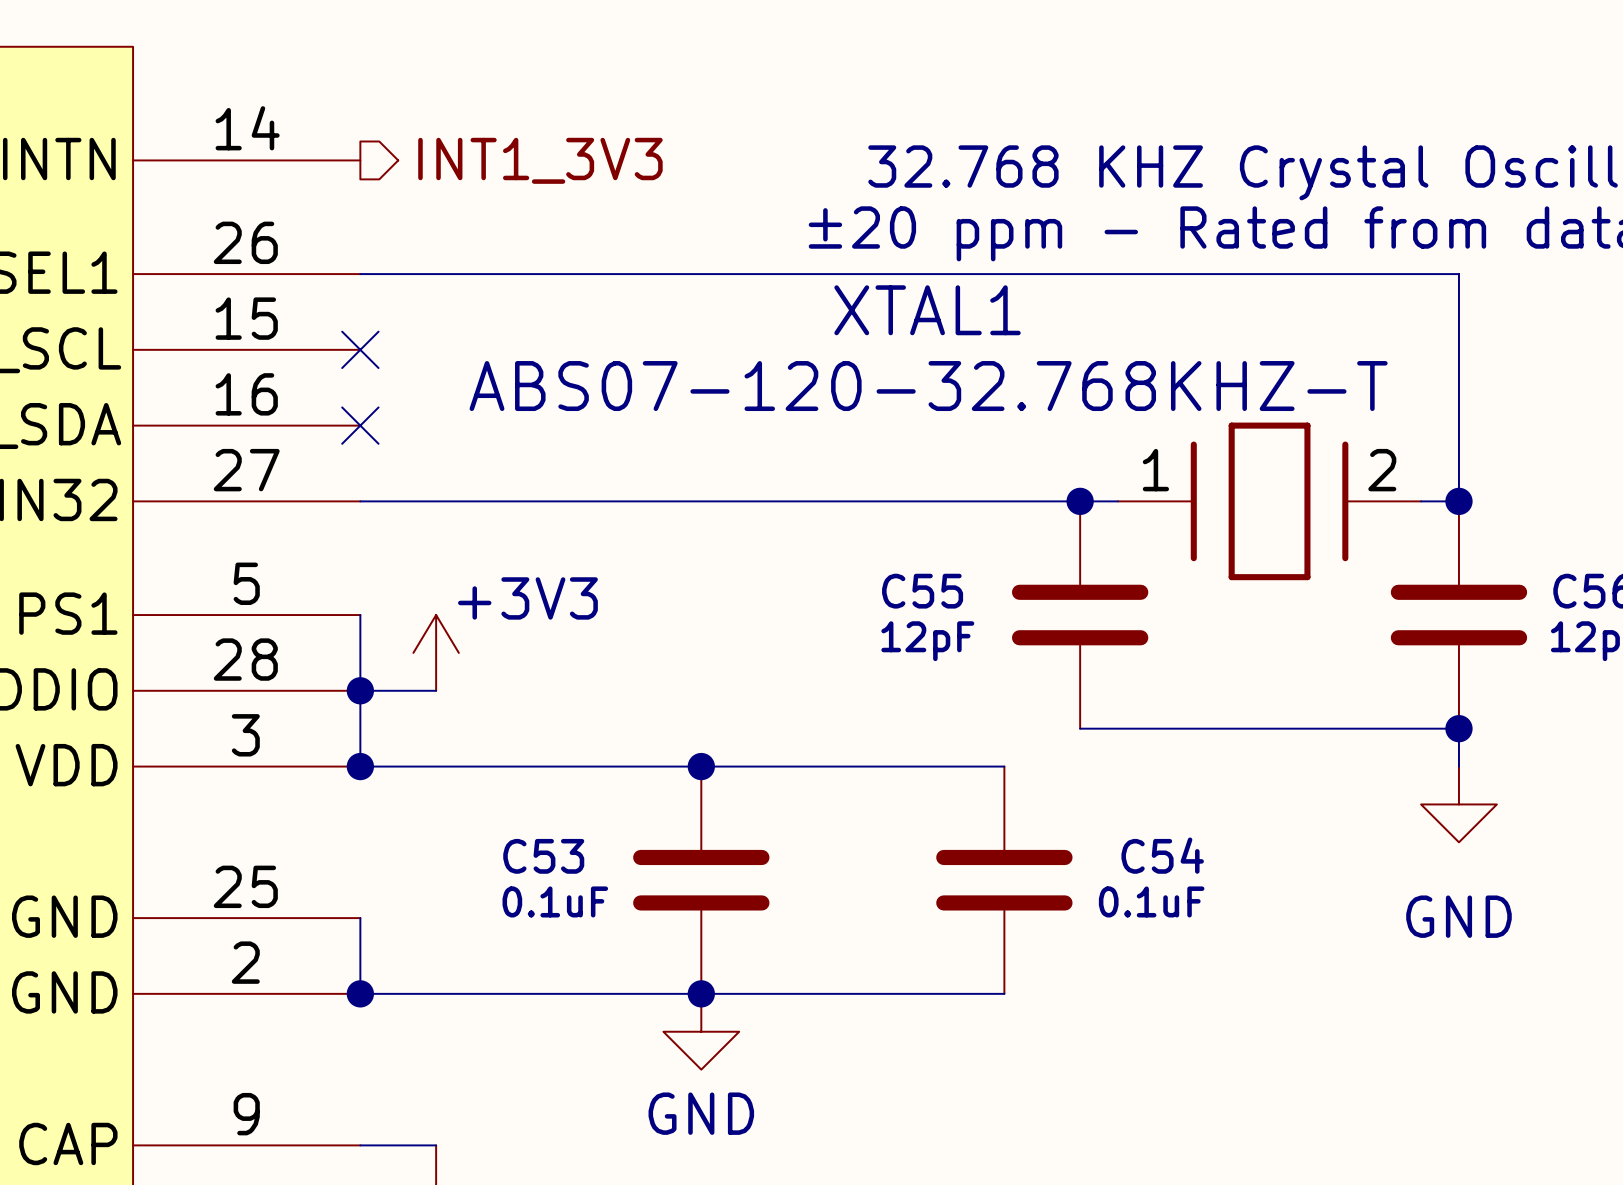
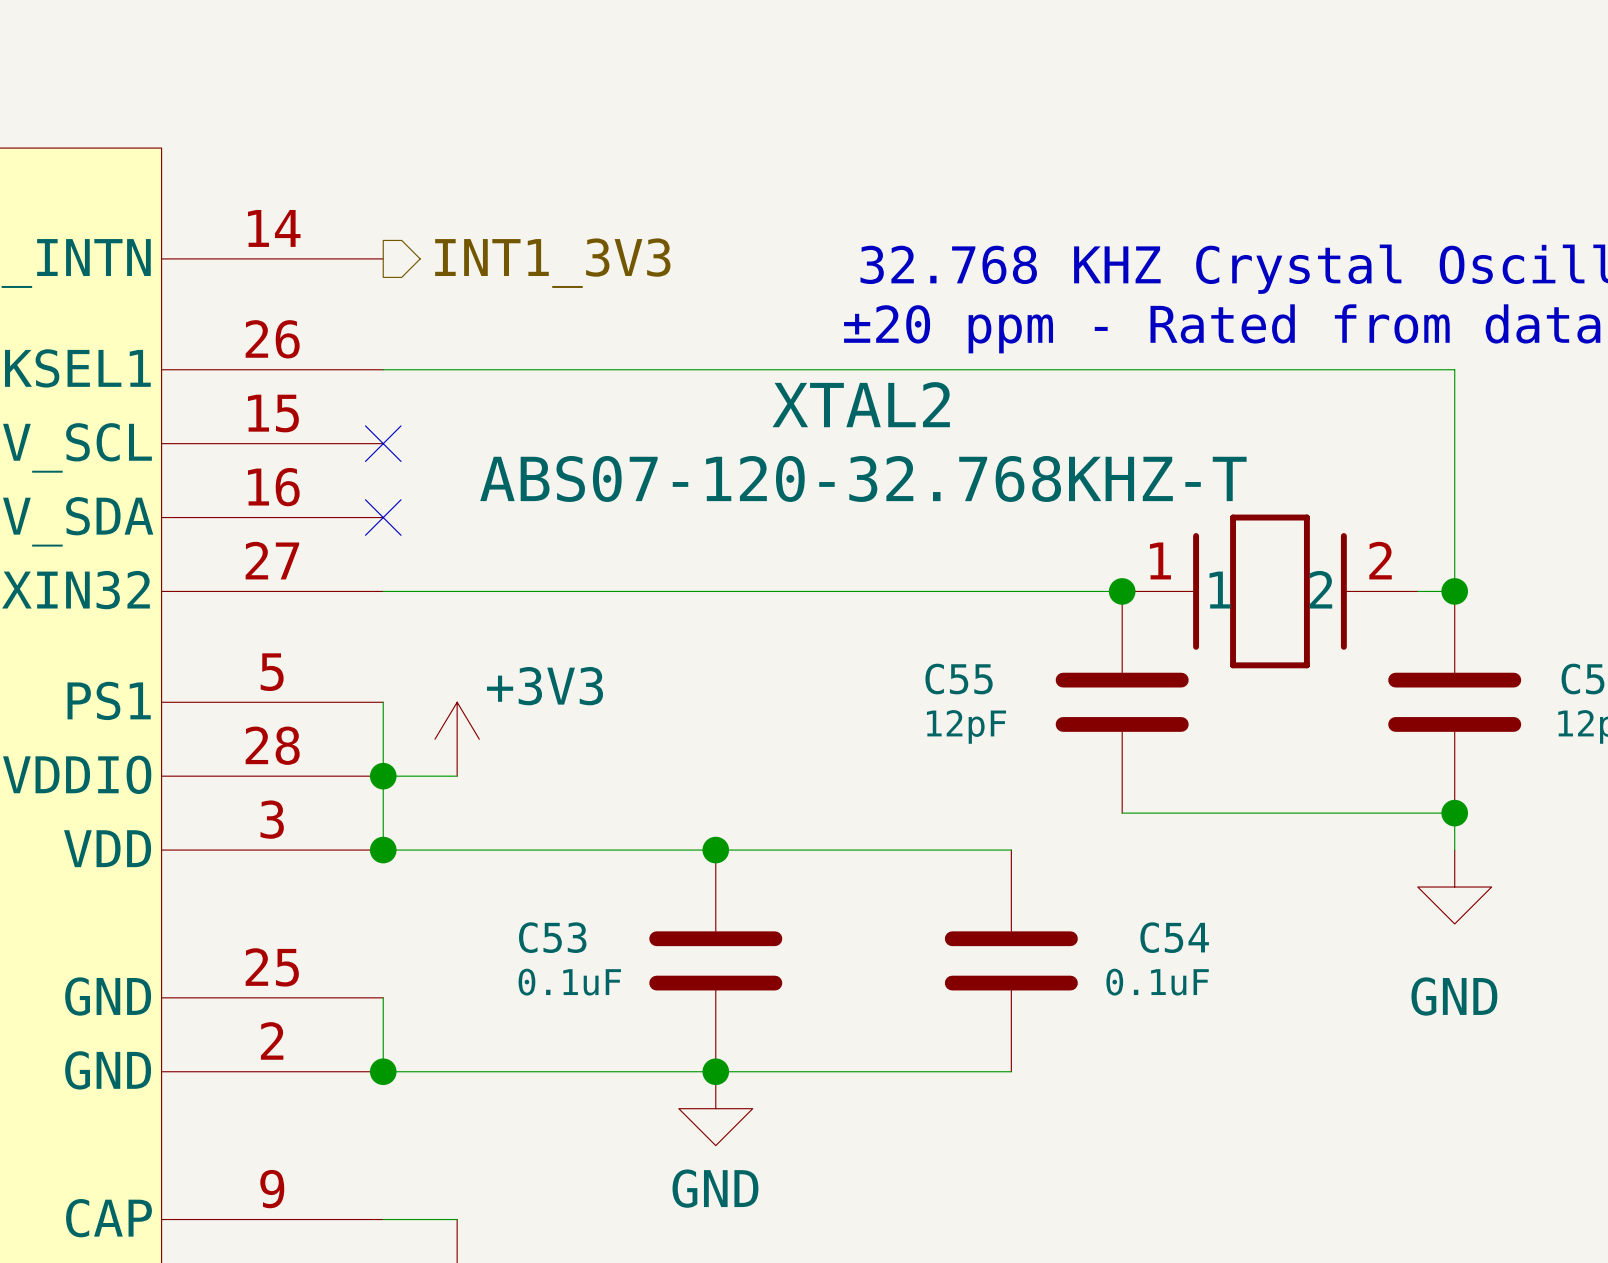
XTAL1 name: XTAL1 (927, 310) -> XTAL2 (861, 404)
XTAL1 value position: ABS07-120-32.768KHZ-T (928, 386) -> ABS07-120-32.768KHZ-T (863, 478)
XTAL1 pin name: none -> 1 (1220, 590)
XTAL1 pin name: none -> 2 (1320, 589)
junction position: (1080, 501) -> (1122, 591)
C55 position: (1080, 615) -> (1122, 702)
wire: (1080, 728) (1118, 728) -> none

